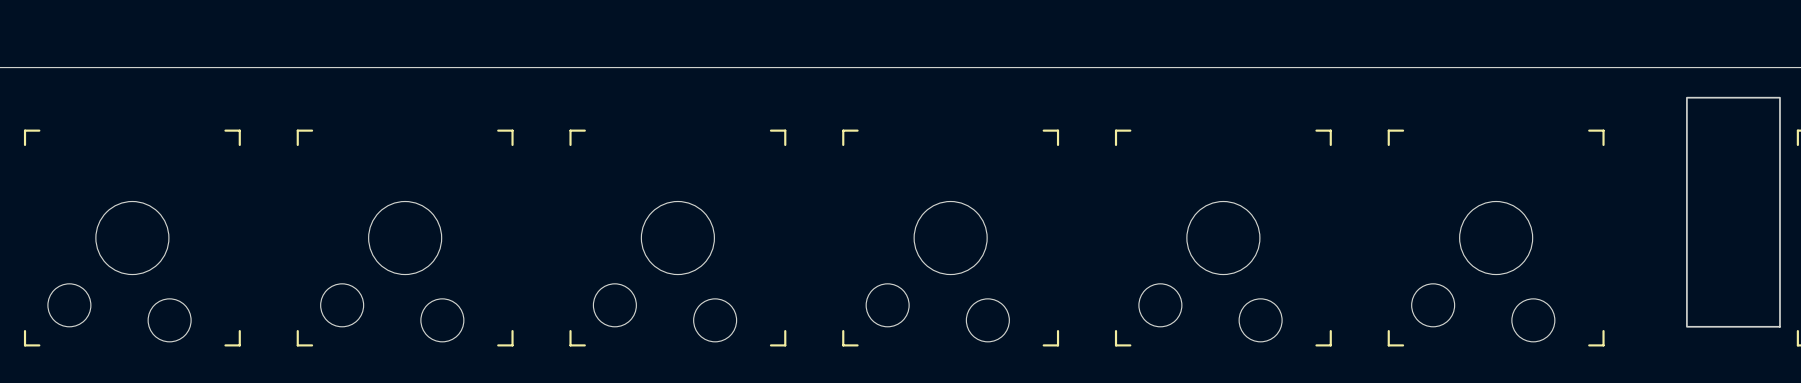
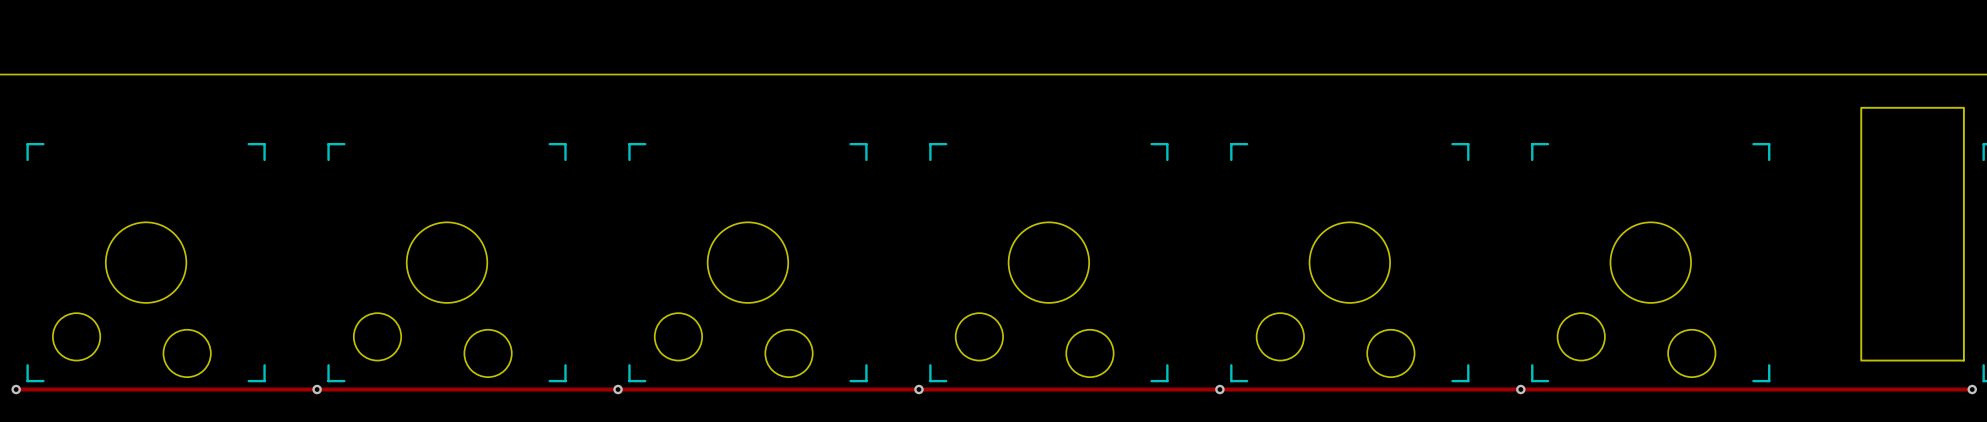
track: none -> (16, 389) (1972, 389)
via: none -> (16, 389)
via: none -> (317, 389)
via: none -> (618, 389)
via: none -> (918, 389)
via: none -> (1219, 389)
via: none -> (1520, 389)
via: none -> (1972, 389)

